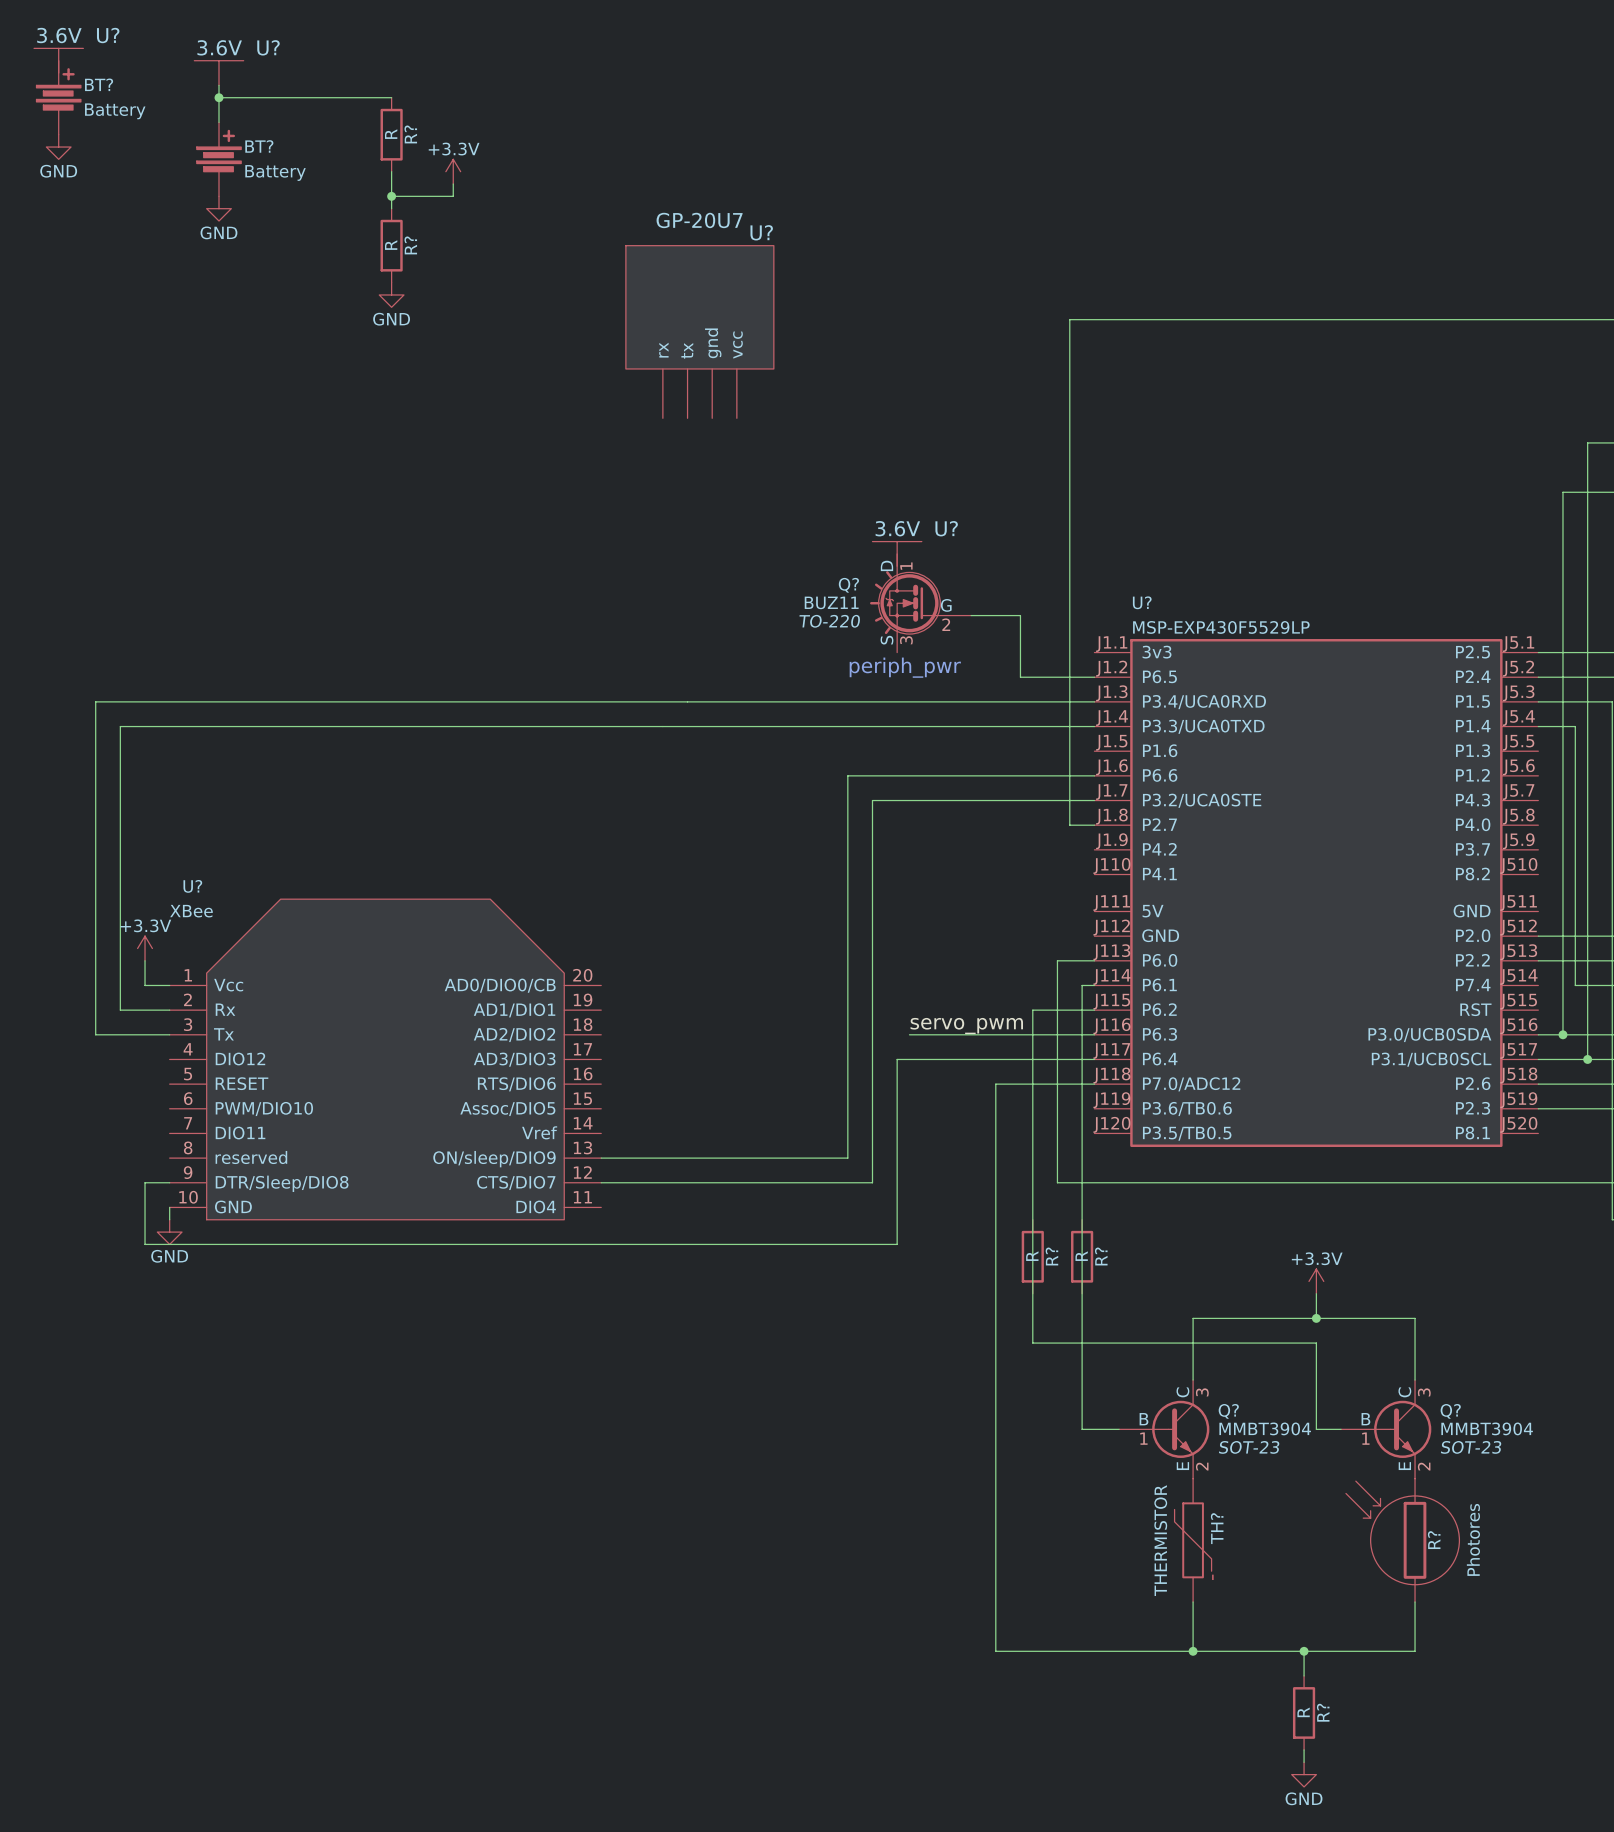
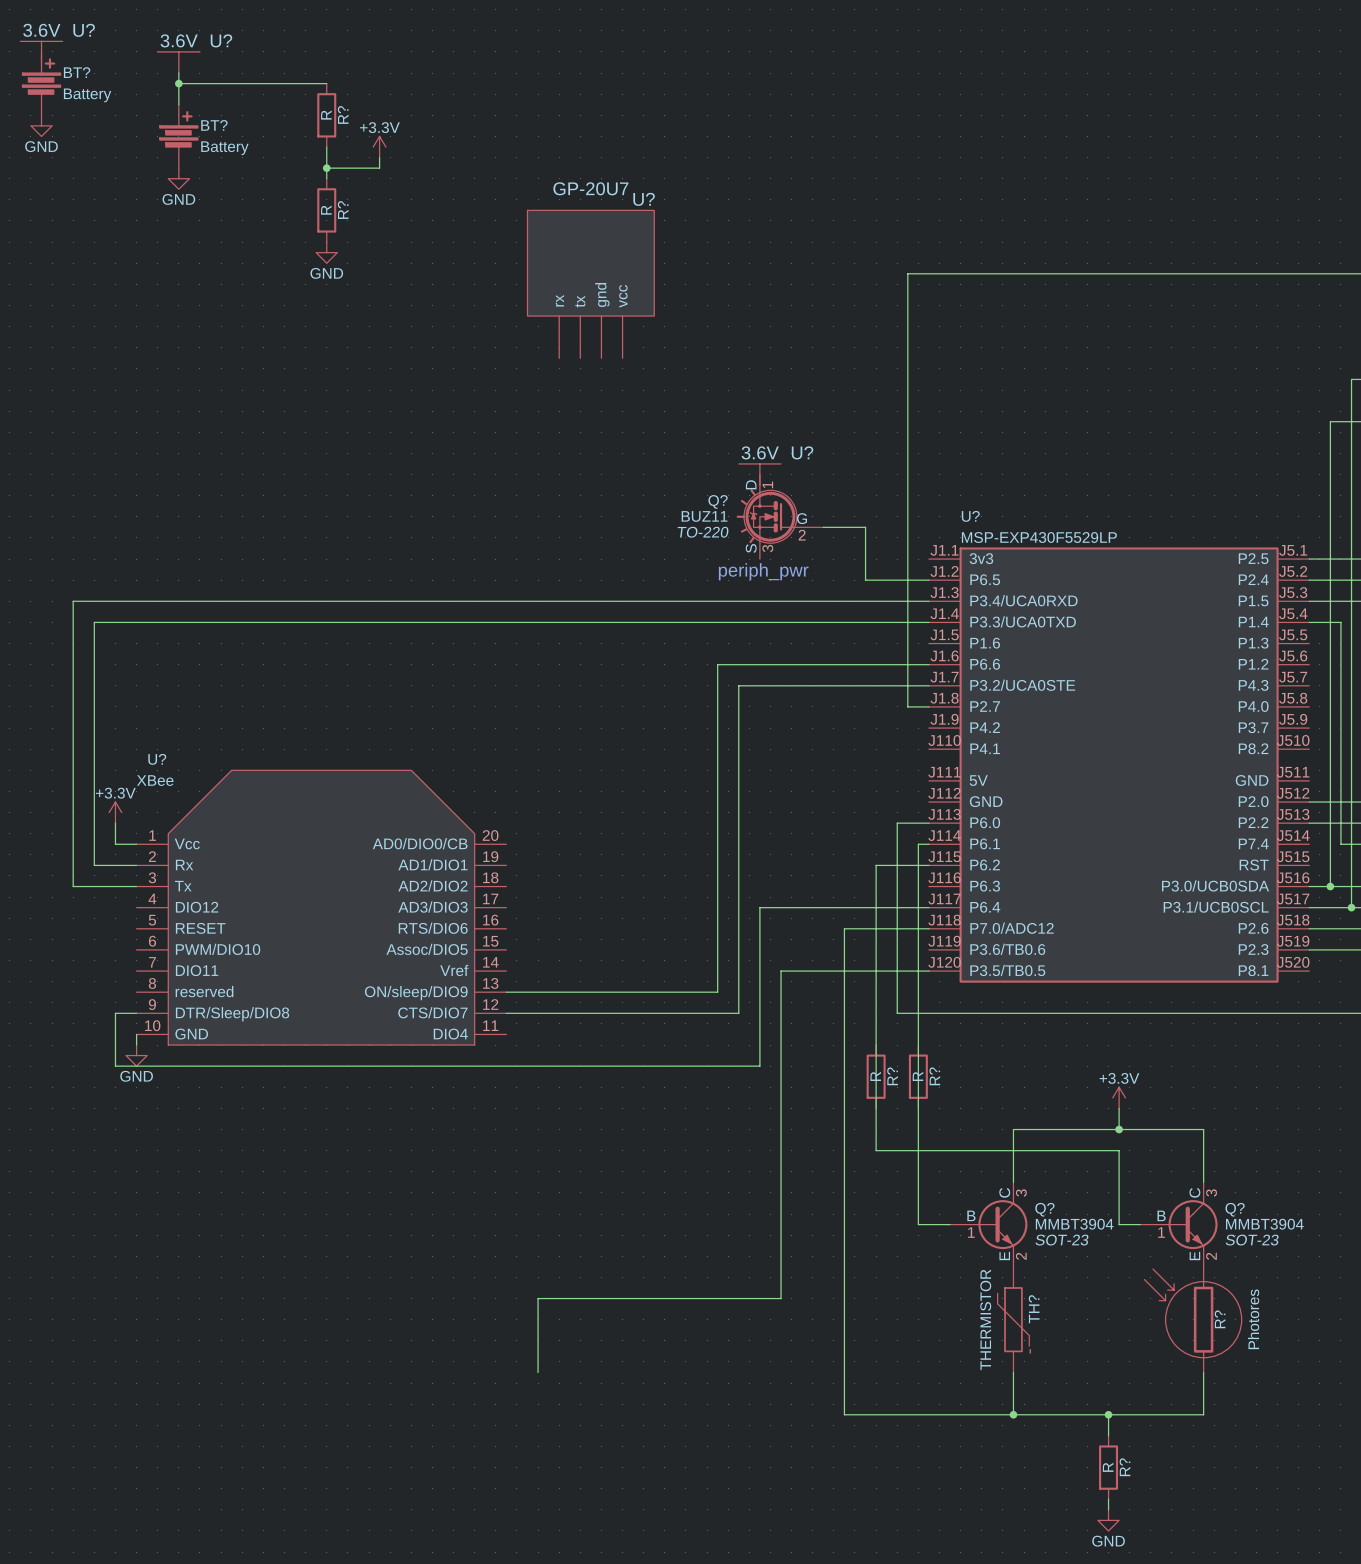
label: servo_pwm (966, 1026) -> none
wire: (909, 1034) (1094, 1034) -> none
wire: none -> (928, 971) (781, 971) (781, 1298) (538, 1298) (538, 1372)

